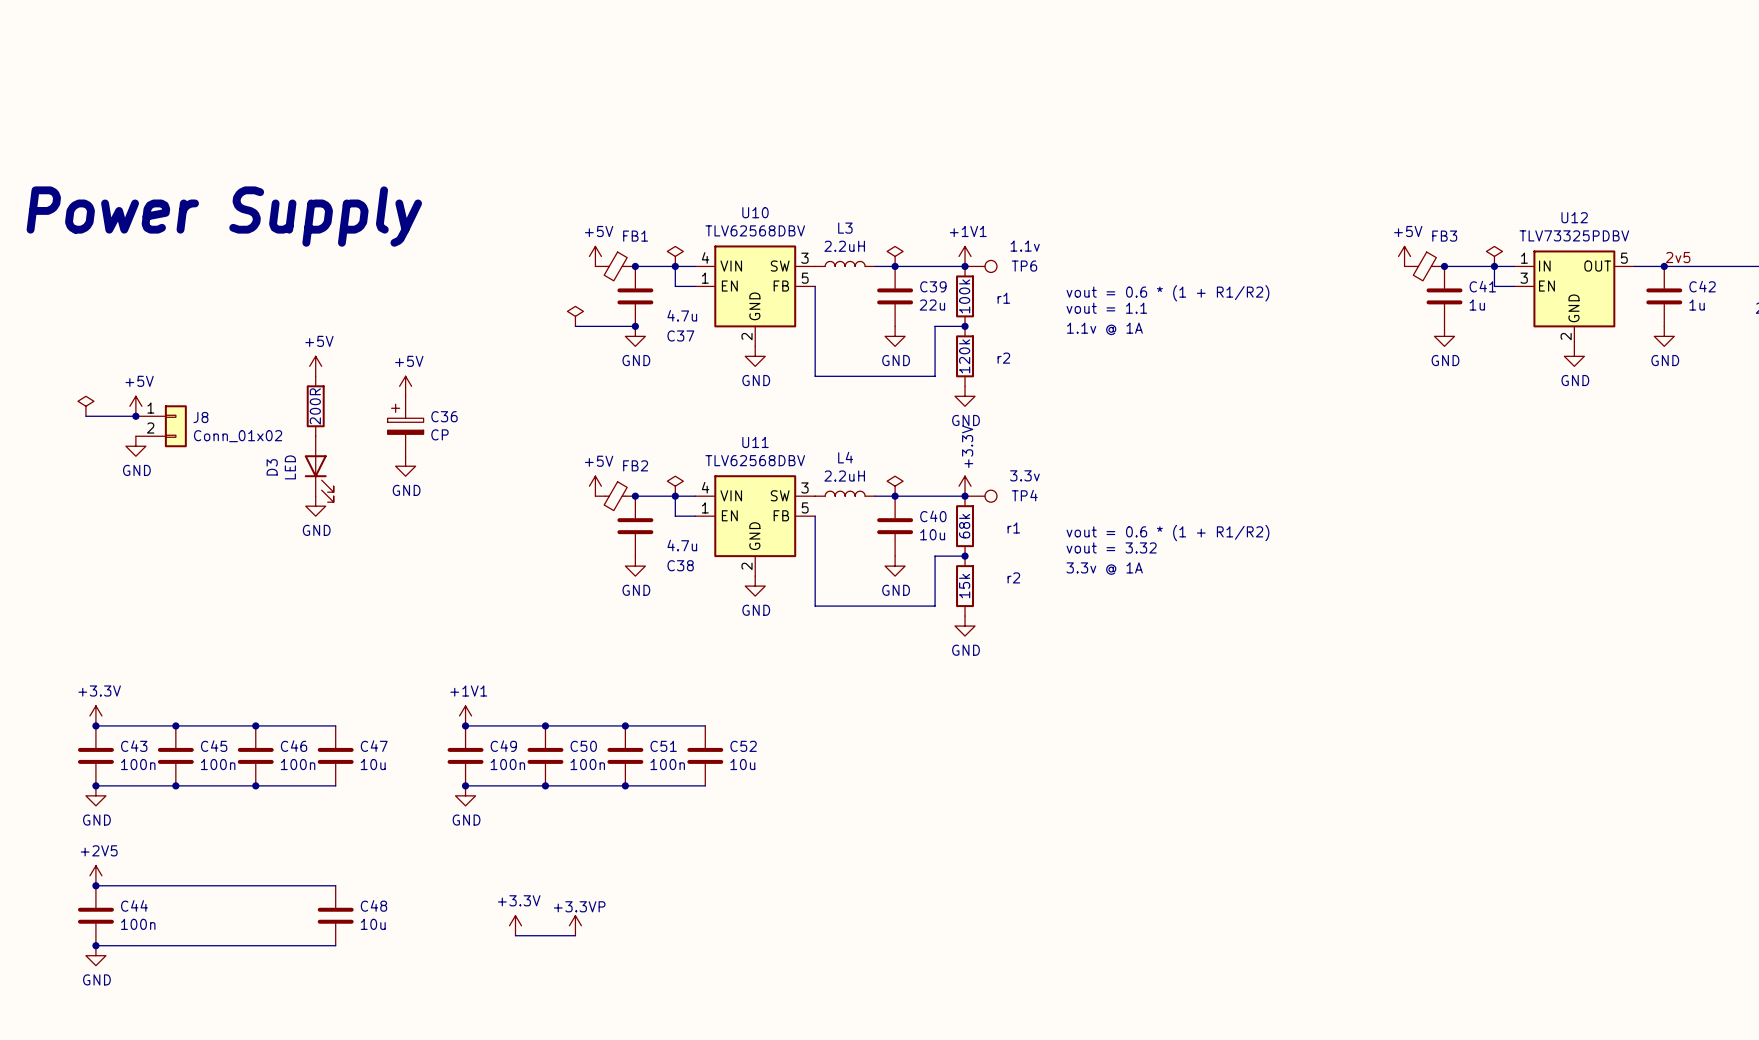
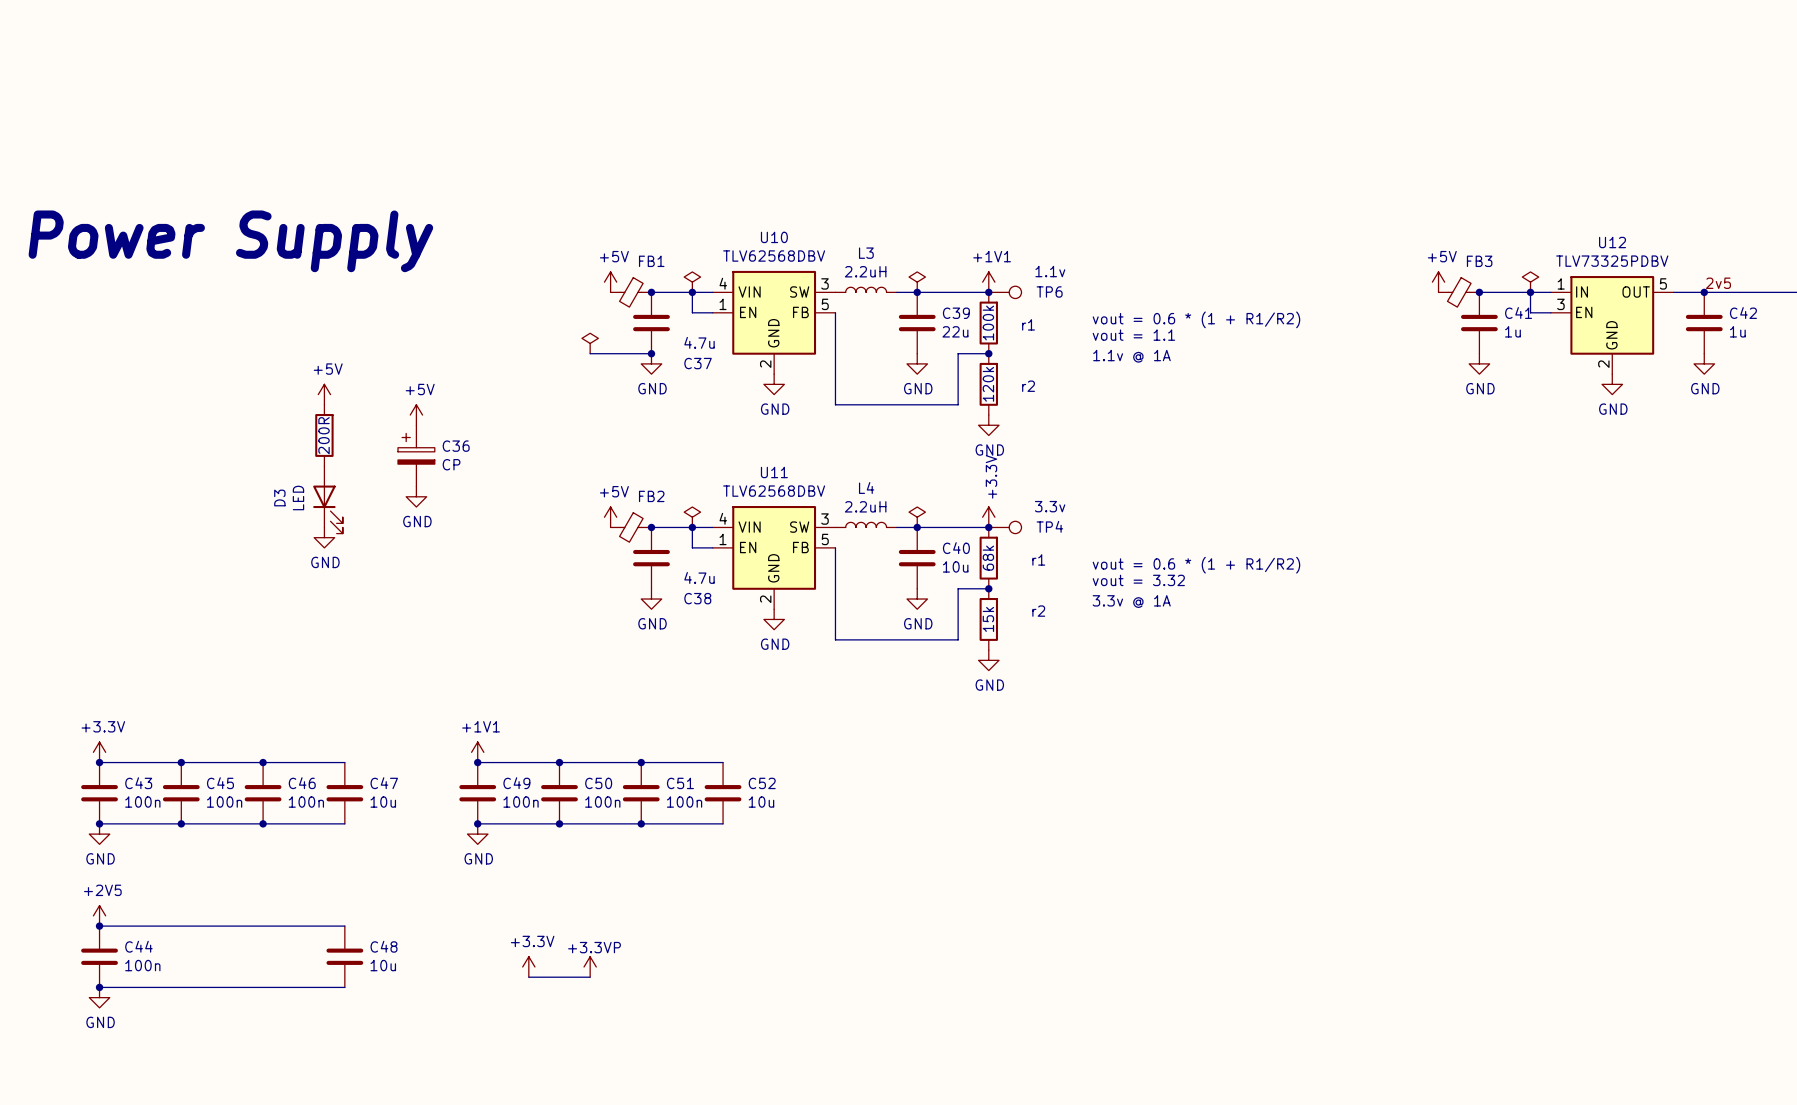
power symbol: (85, 406) -> none
power symbol: +5V (135, 406) -> none
wire: (85, 416) (135, 416) -> none
junction: (135, 416) -> none
J8: Conn_01x02 (161, 426) -> none
power symbol: GND (135, 446) -> none

